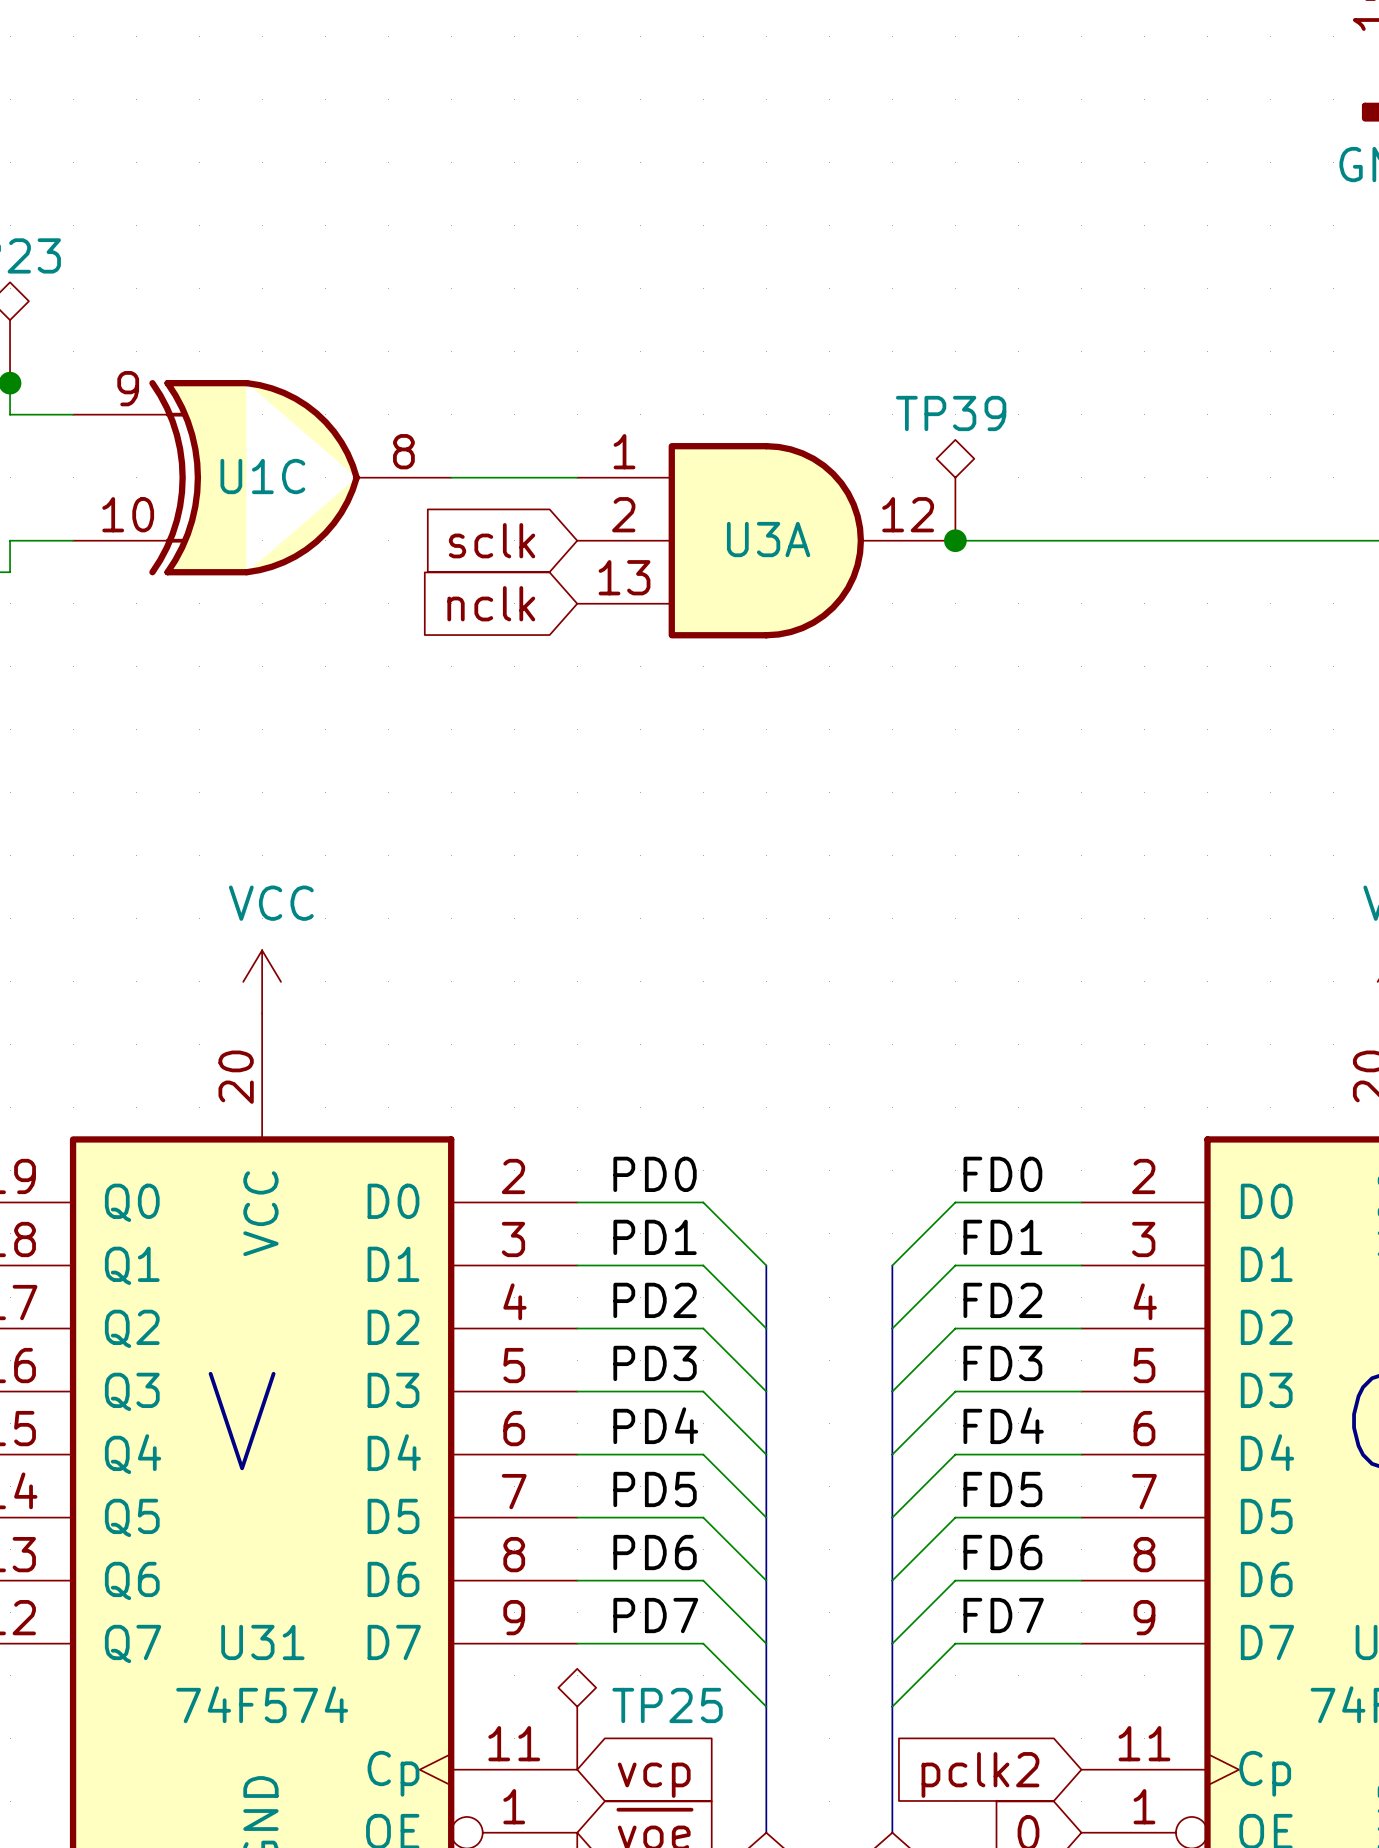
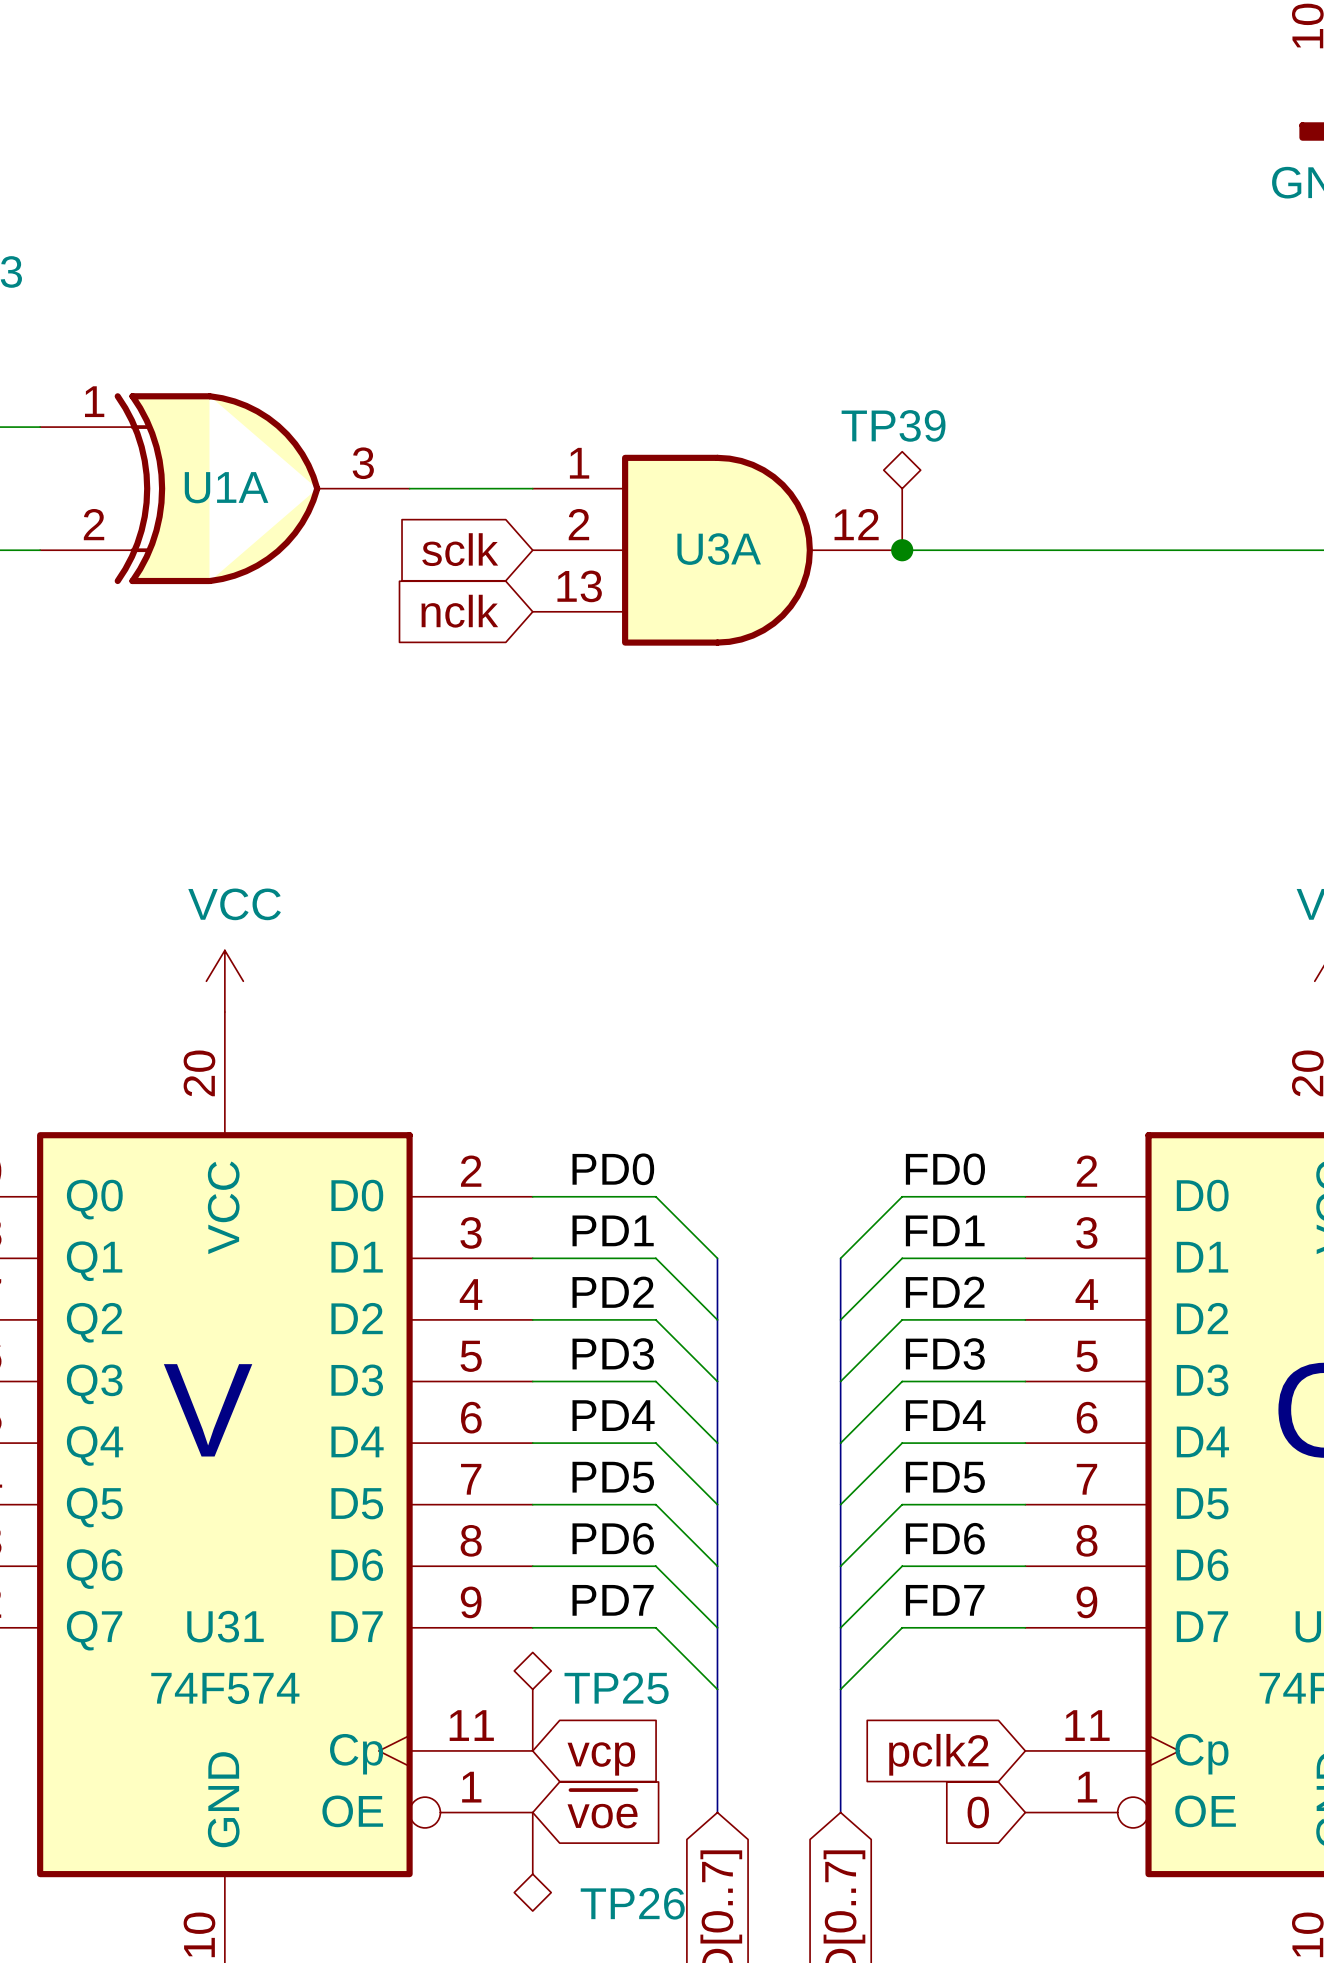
U1C pin number: 9 (128, 388) -> 1 (94, 401)
U1C pin number: 8 (403, 451) -> 3 (363, 463)
U1C name: U1C (262, 476) -> U1A (226, 487)
U1C pin number: 10 (128, 514) -> 2 (94, 524)

